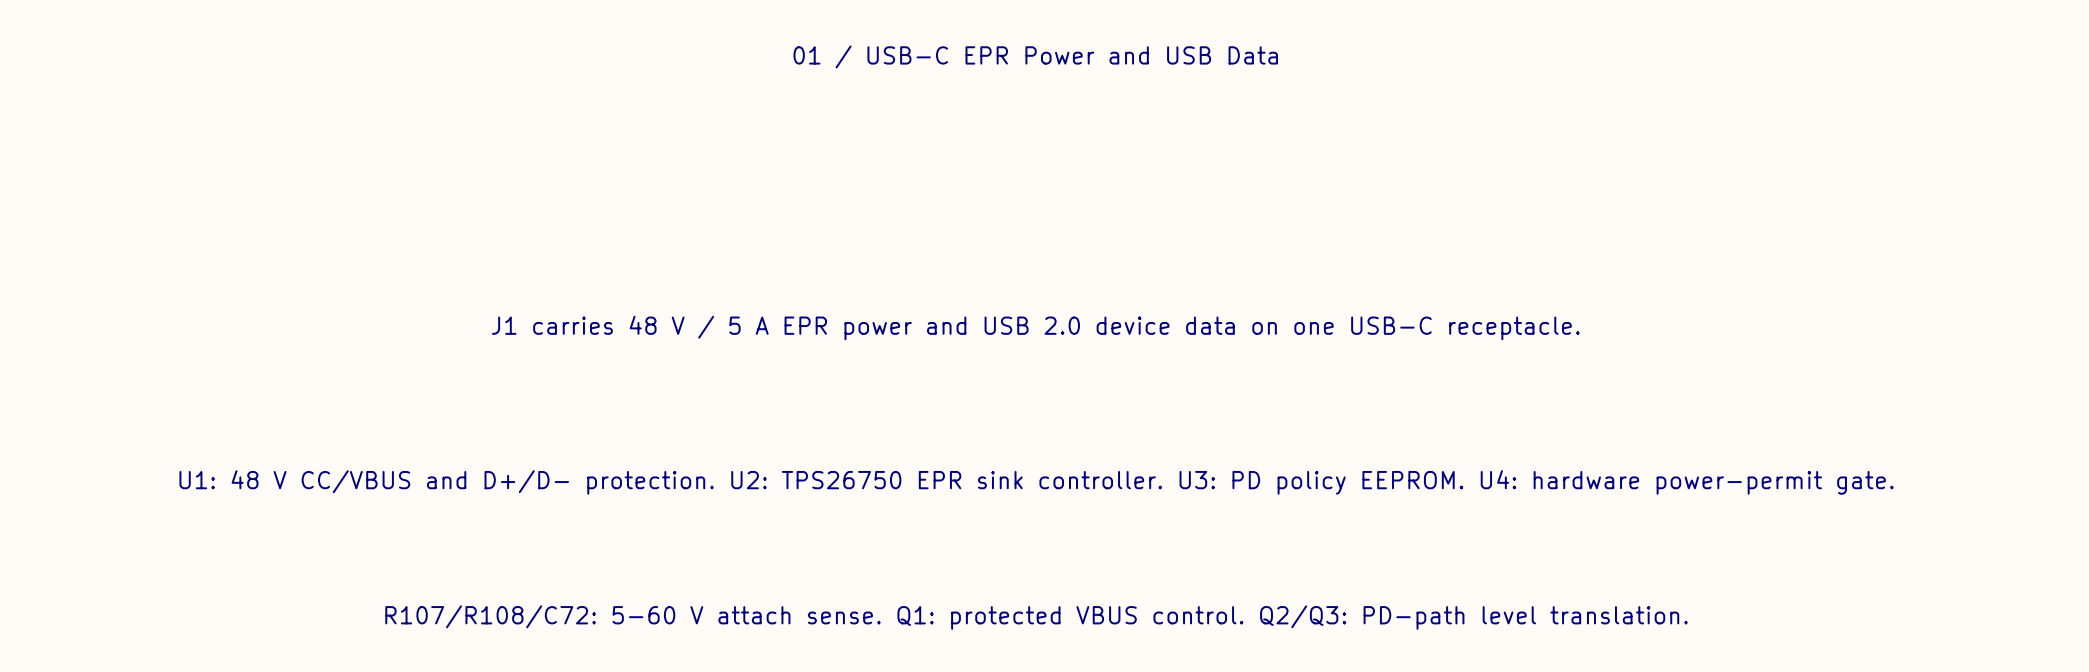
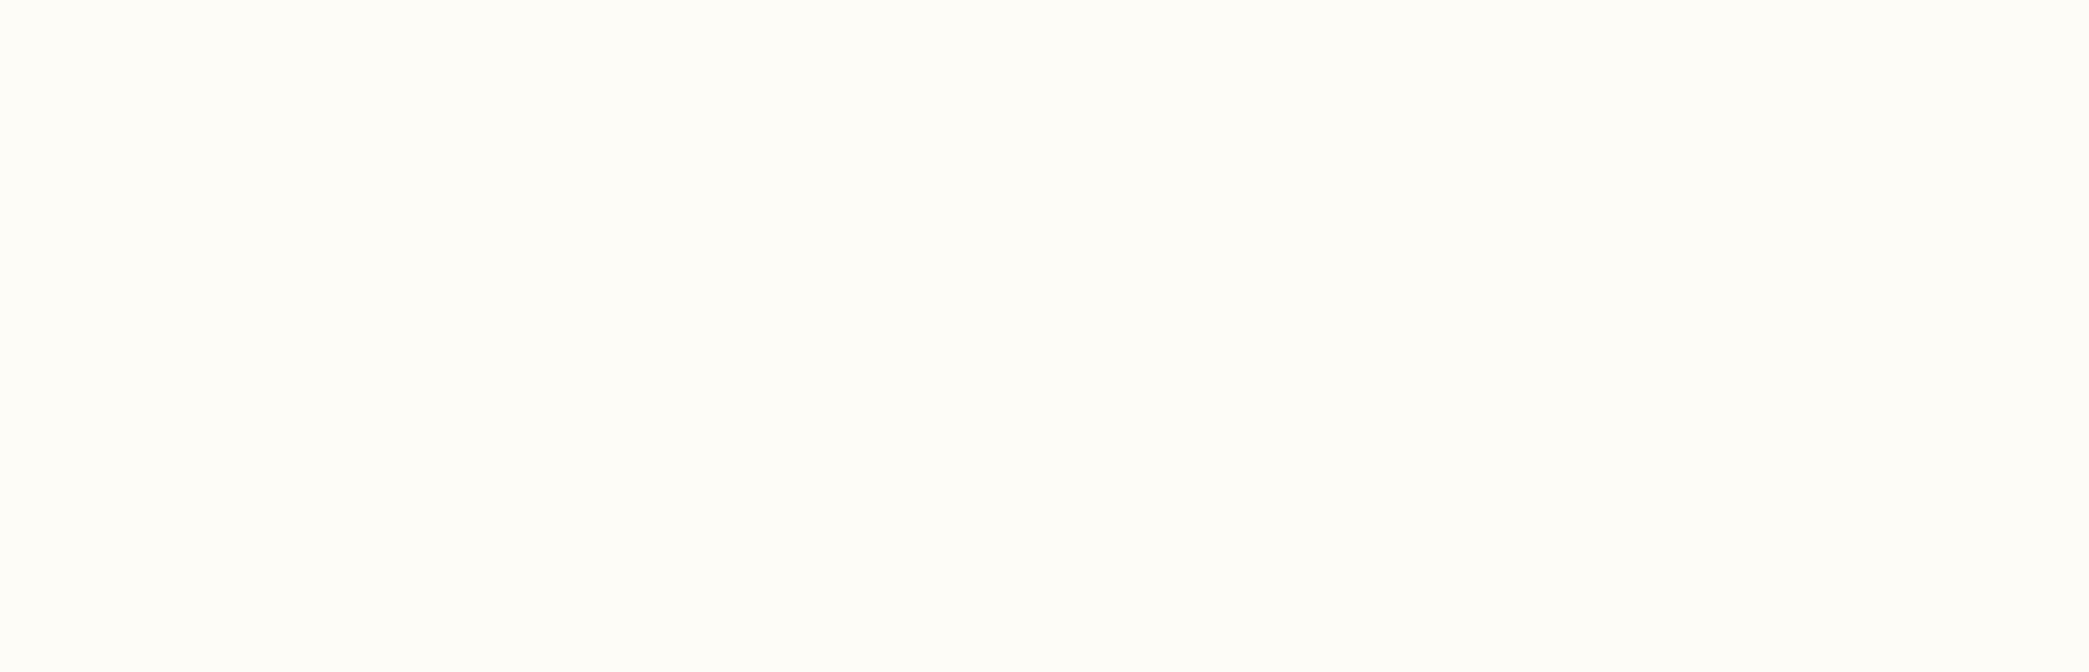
text: 01 / USB-C EPR Power and USB Data (1035, 56) -> none
text: J1 carries 48 V / 5 A EPR power and USB 2.0 device data on one USB-C receptacle. (1035, 328) -> none
text: U1: 48 V CC/VBUS and D+/D- protection. U2: TPS26750 EPR sink controller. U3: PD policy EEPROM. U4: hardware power-permit gate. (1036, 482) -> none
text: R107/R108/C72: 5-60 V attach sense. Q1: protected VBUS control. Q2/Q3: PD-path level translation. (1036, 617) -> none

